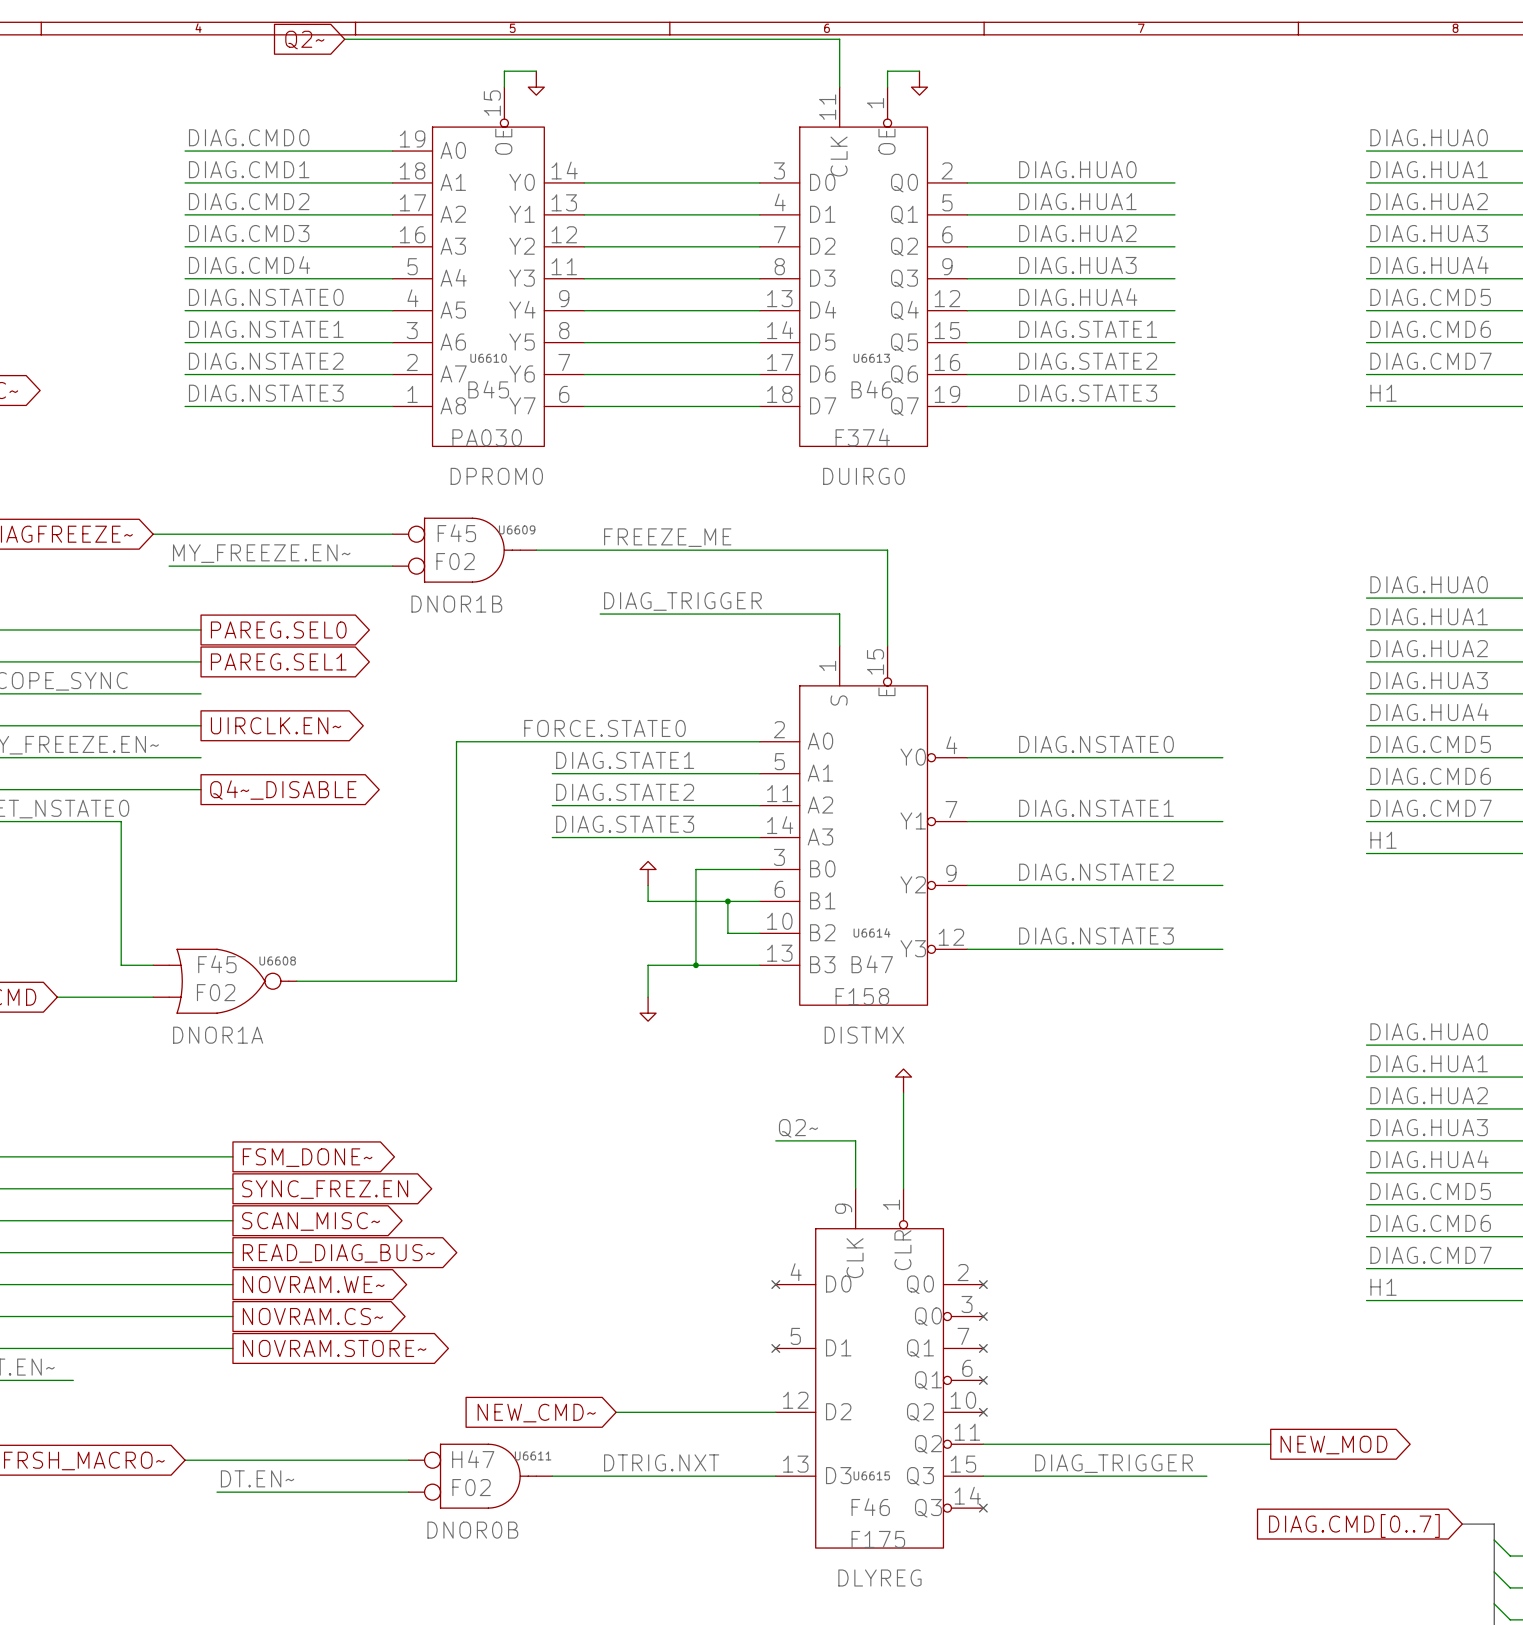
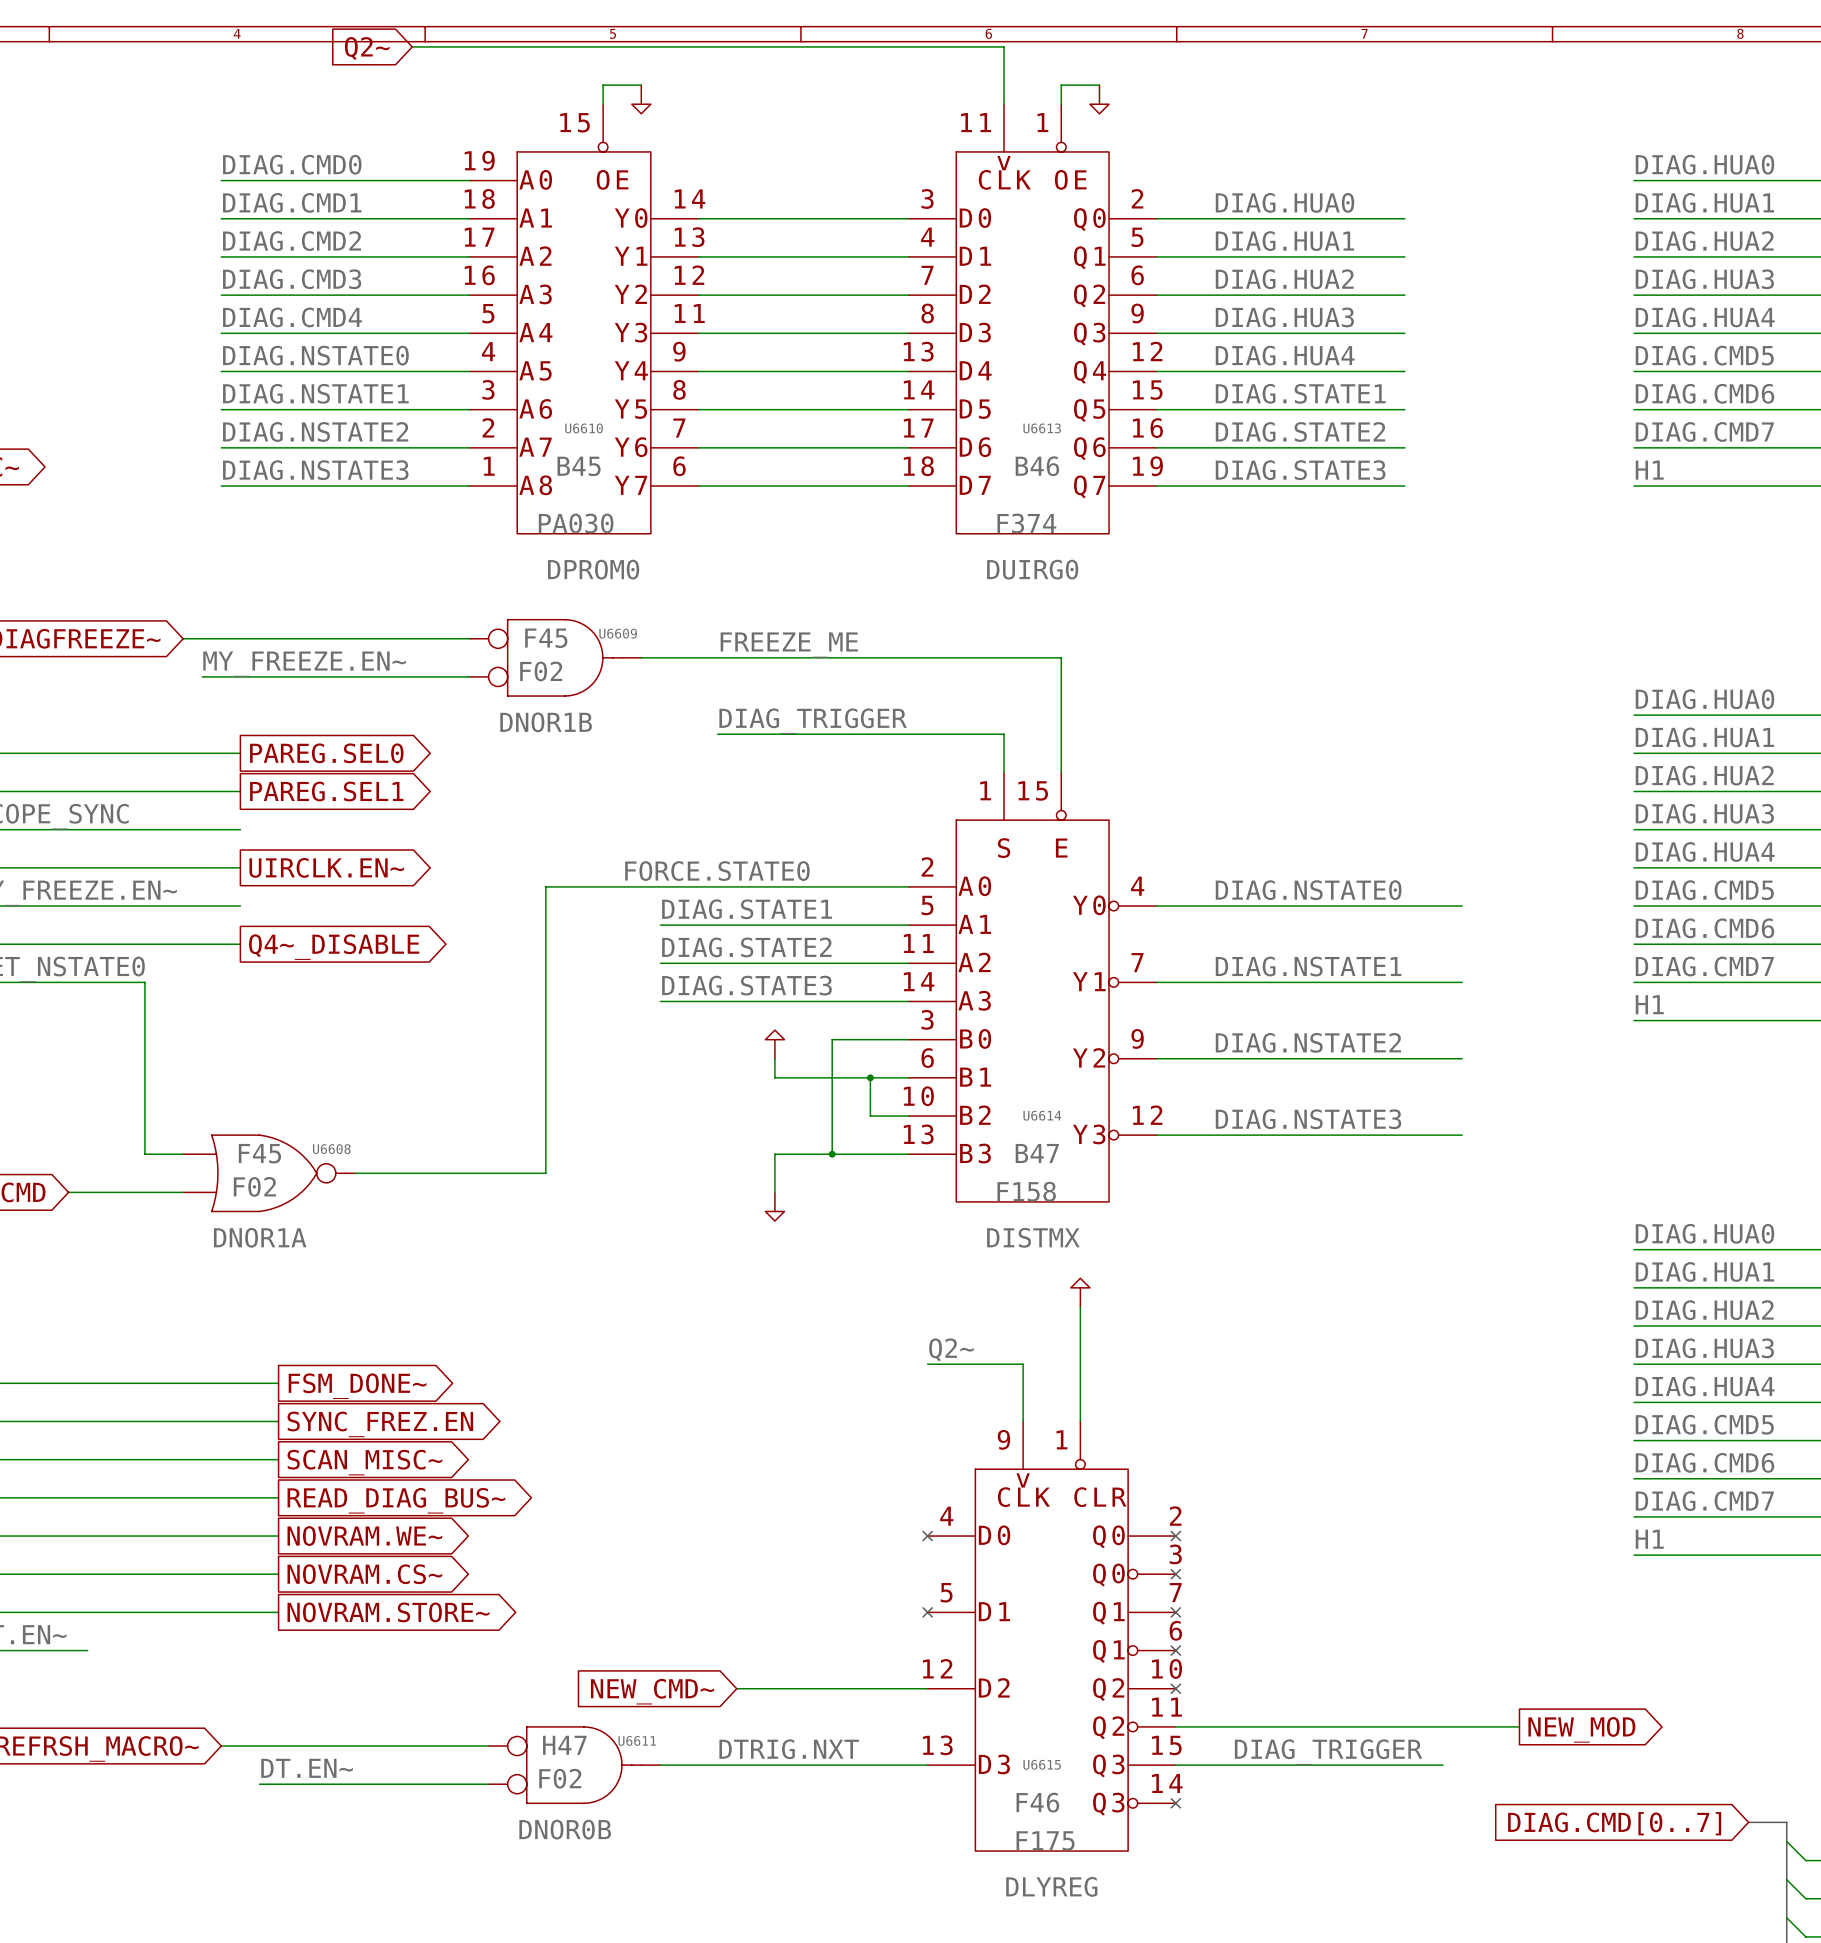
U6610 symbol: [392, 87, 585, 447] -> [469, 104, 699, 534]
U6613 symbol: [759, 87, 968, 447] -> [908, 104, 1157, 534]
U6614 symbol: [759, 645, 968, 1006] -> [908, 772, 1157, 1202]
U6615 symbol: [775, 1188, 984, 1549] -> [927, 1421, 1176, 1852]

